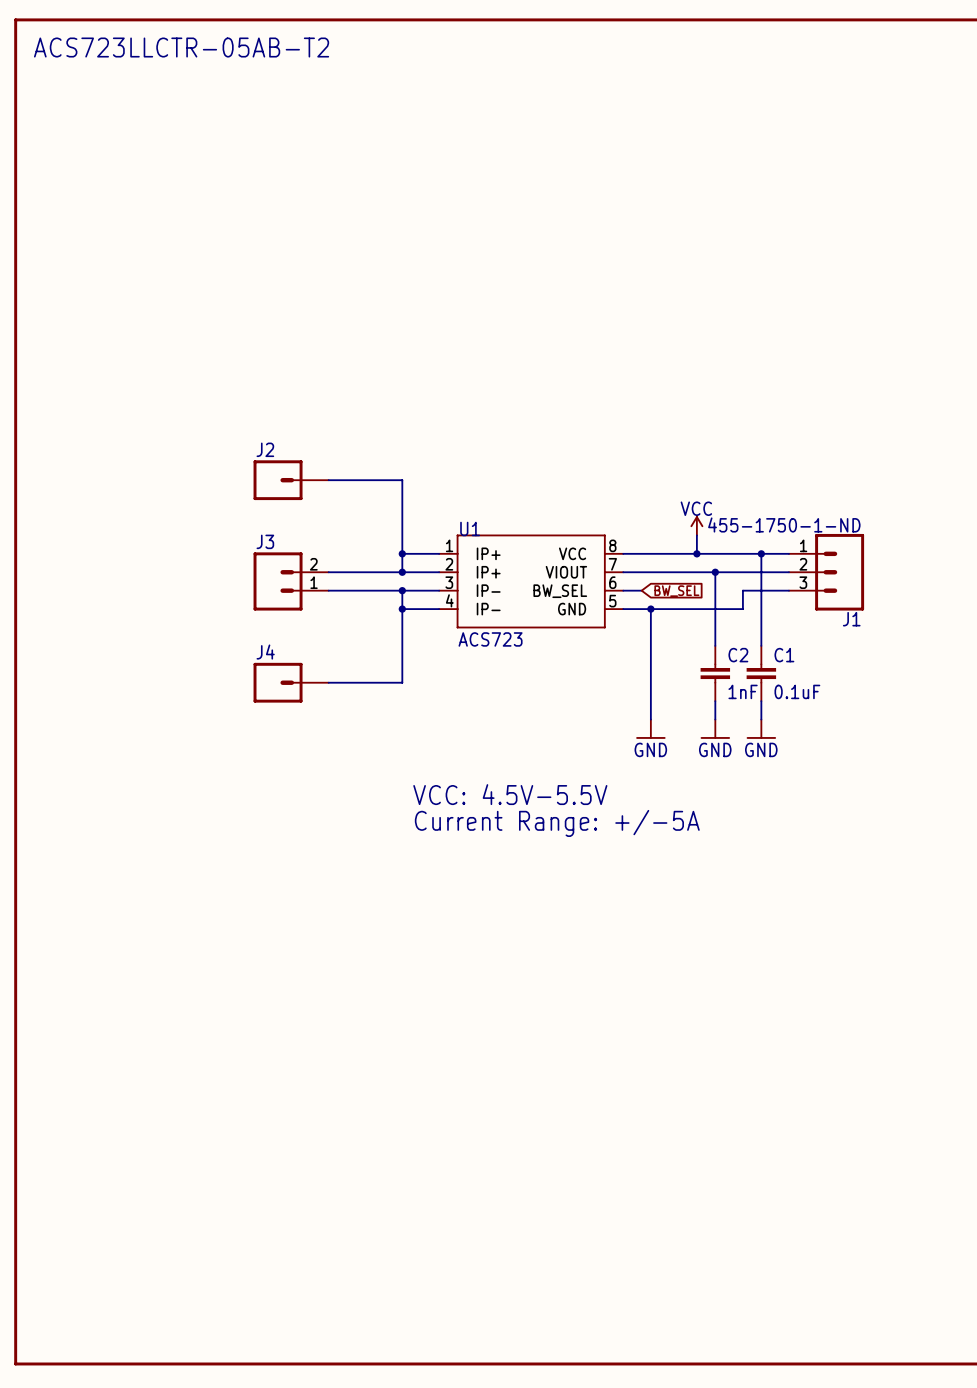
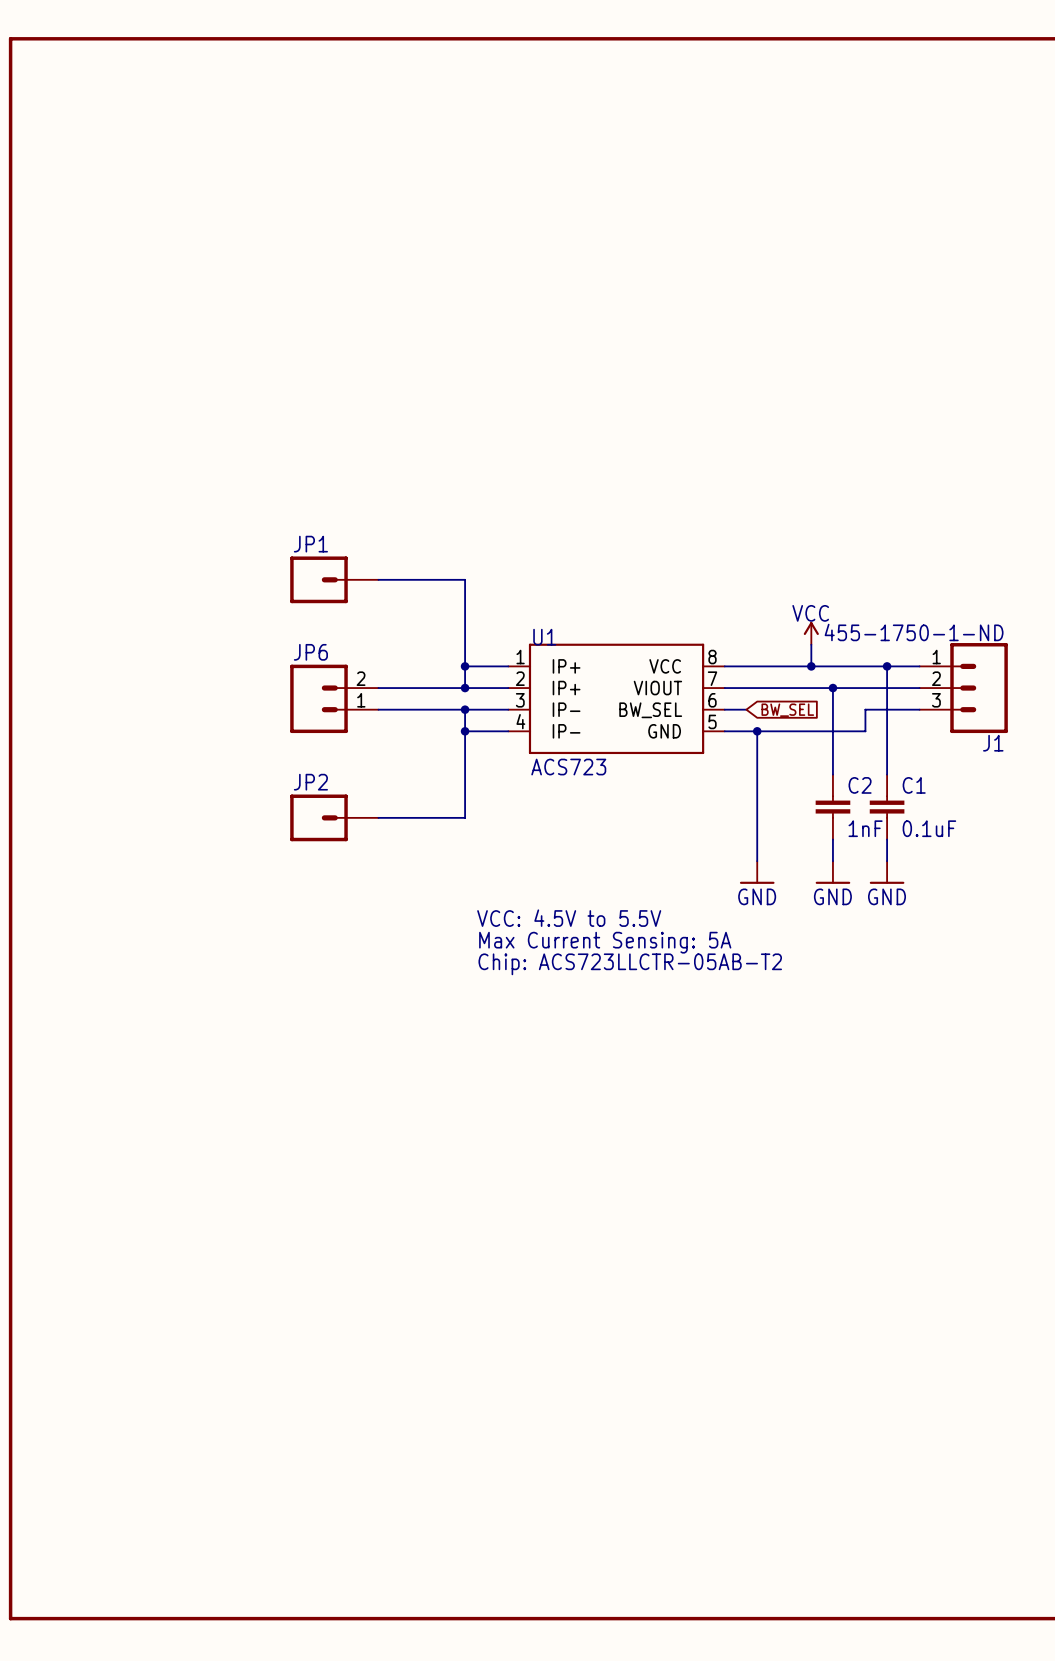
text: ACS723LLCTR-05AB-T2 (181, 47) -> none
J2 name: J2 (265, 449) -> JP1 (310, 544)
J3 name: J3 (265, 541) -> JP6 (310, 652)
J4 name: J4 (265, 652) -> JP2 (310, 782)
text: none -> Max Current Sensing: 5A (605, 942)
text: VCC: 4.5V-5.5V (510, 794) -> VCC: 4.5V to 5.5V (569, 918)
text: none -> Chip: ACS723LLCTR-05AB-T2 (630, 964)
text: Current Range: +/-5A (557, 823) -> none

